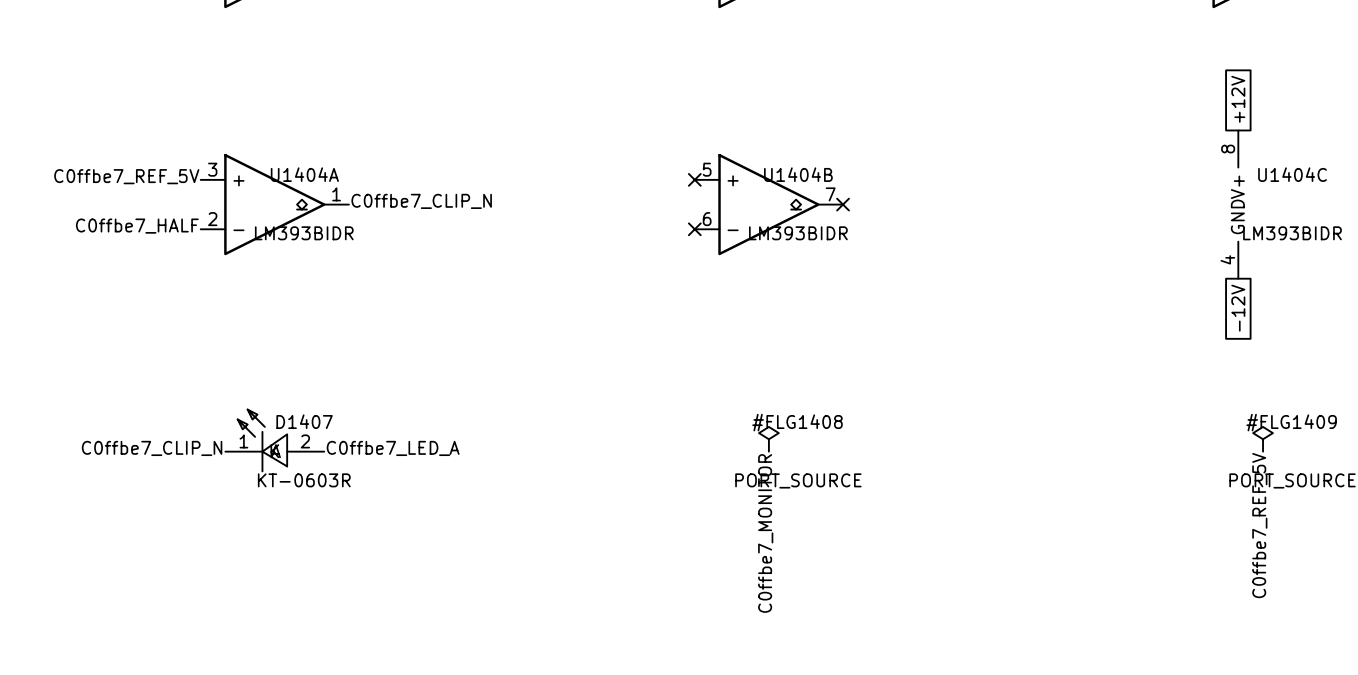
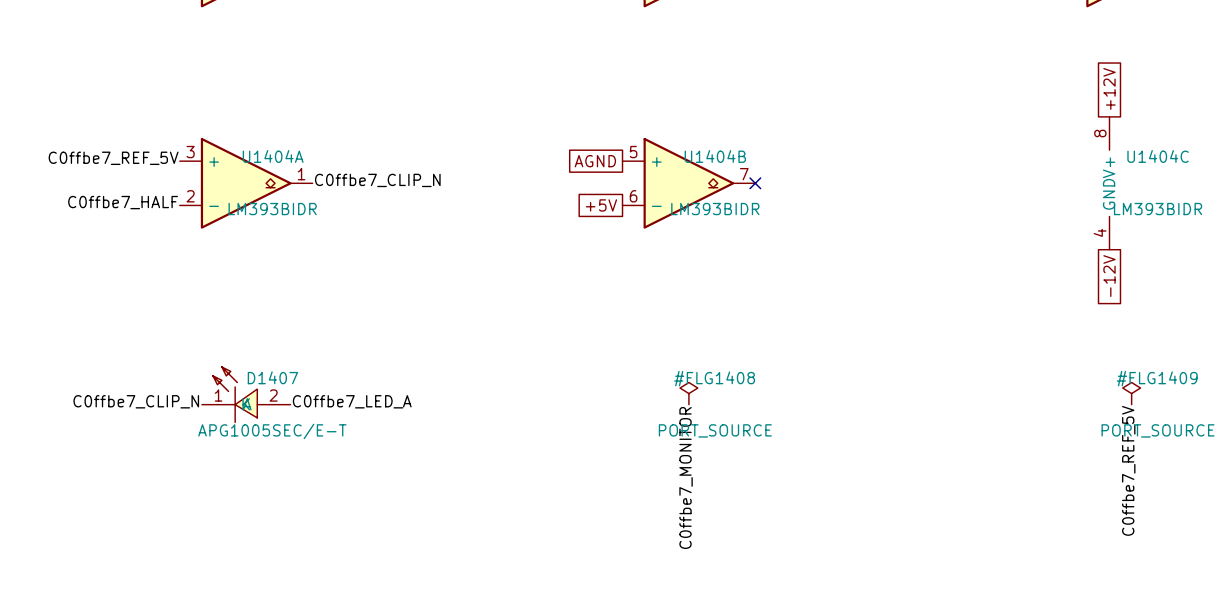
global label: none -> AGND (595, 161)
no-connect mark: (694, 179) -> none
global label: none -> +5V (601, 205)
no-connect mark: (694, 229) -> none
D1407 value: KT-0603R (304, 480) -> APG1005SEC/E-T (272, 431)

